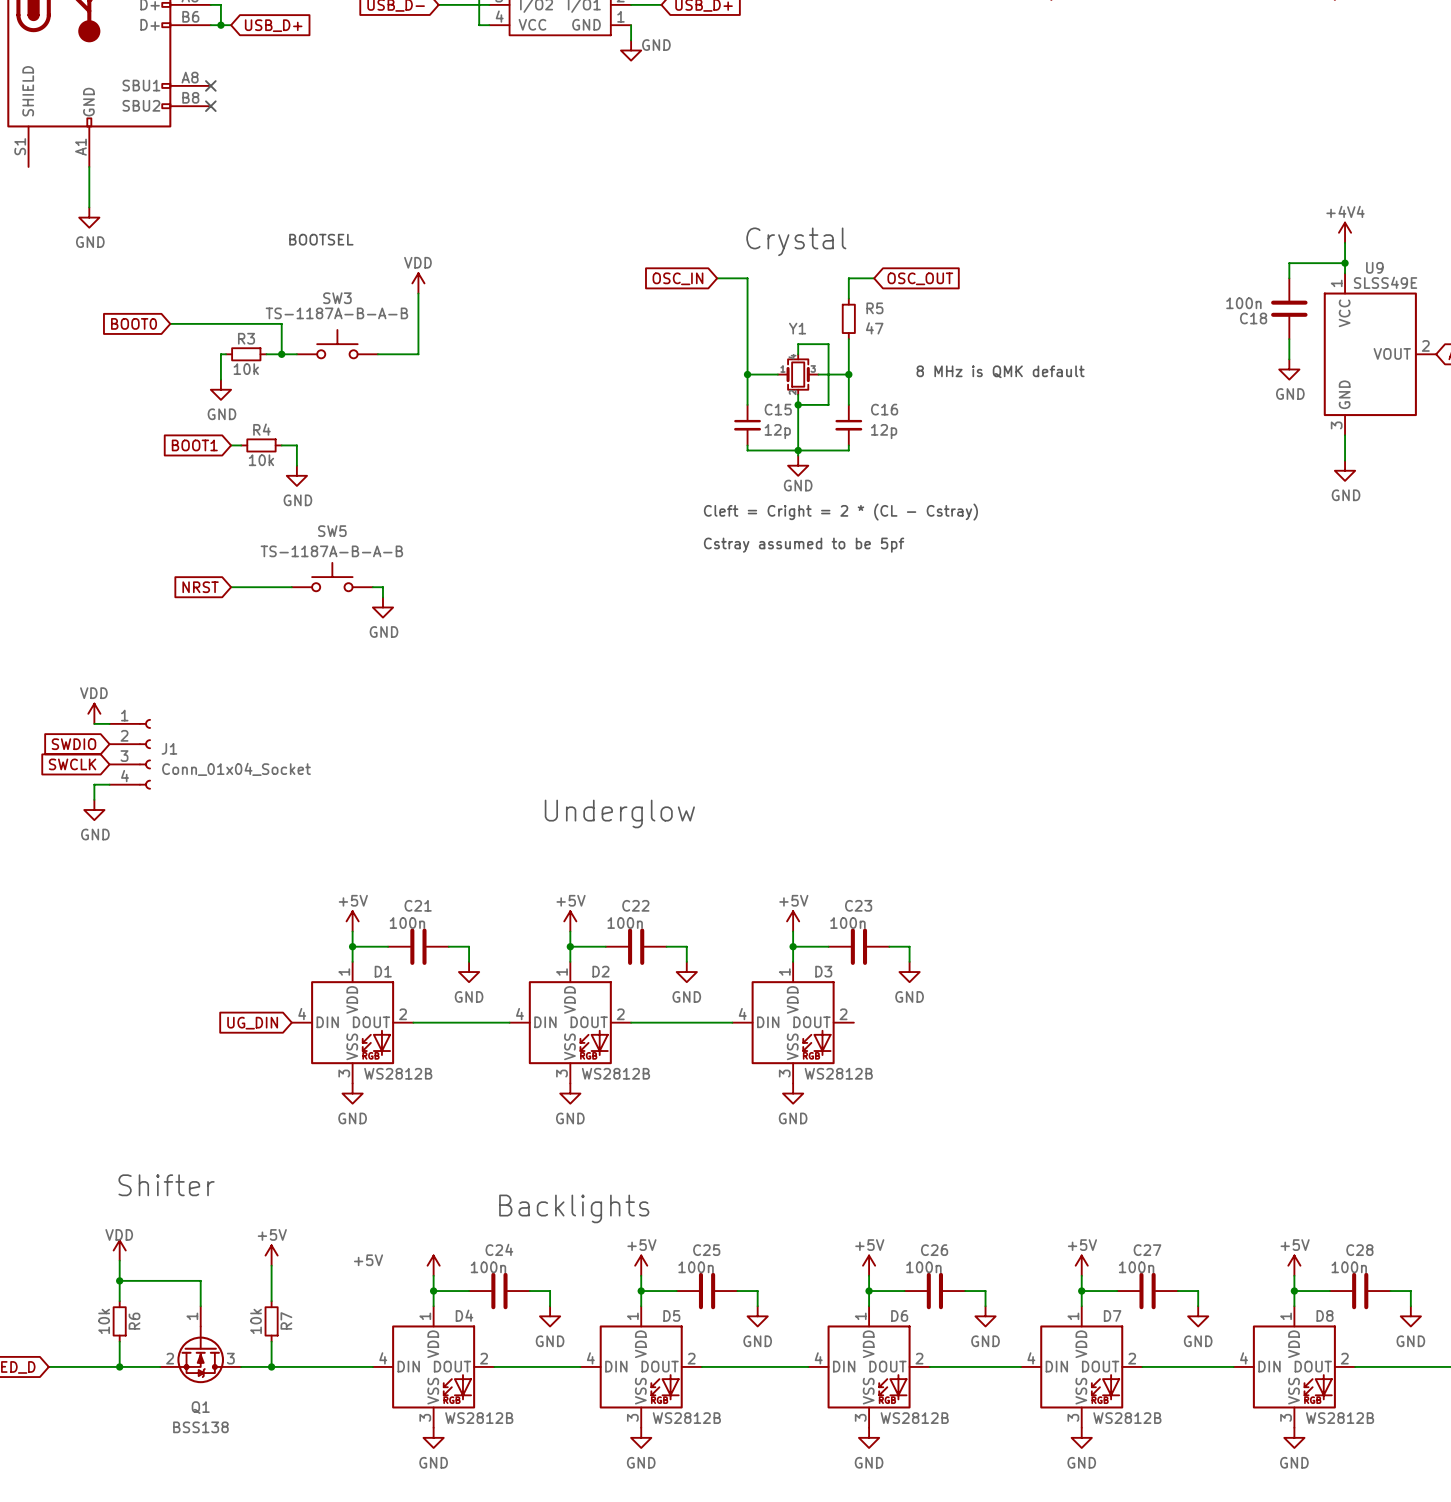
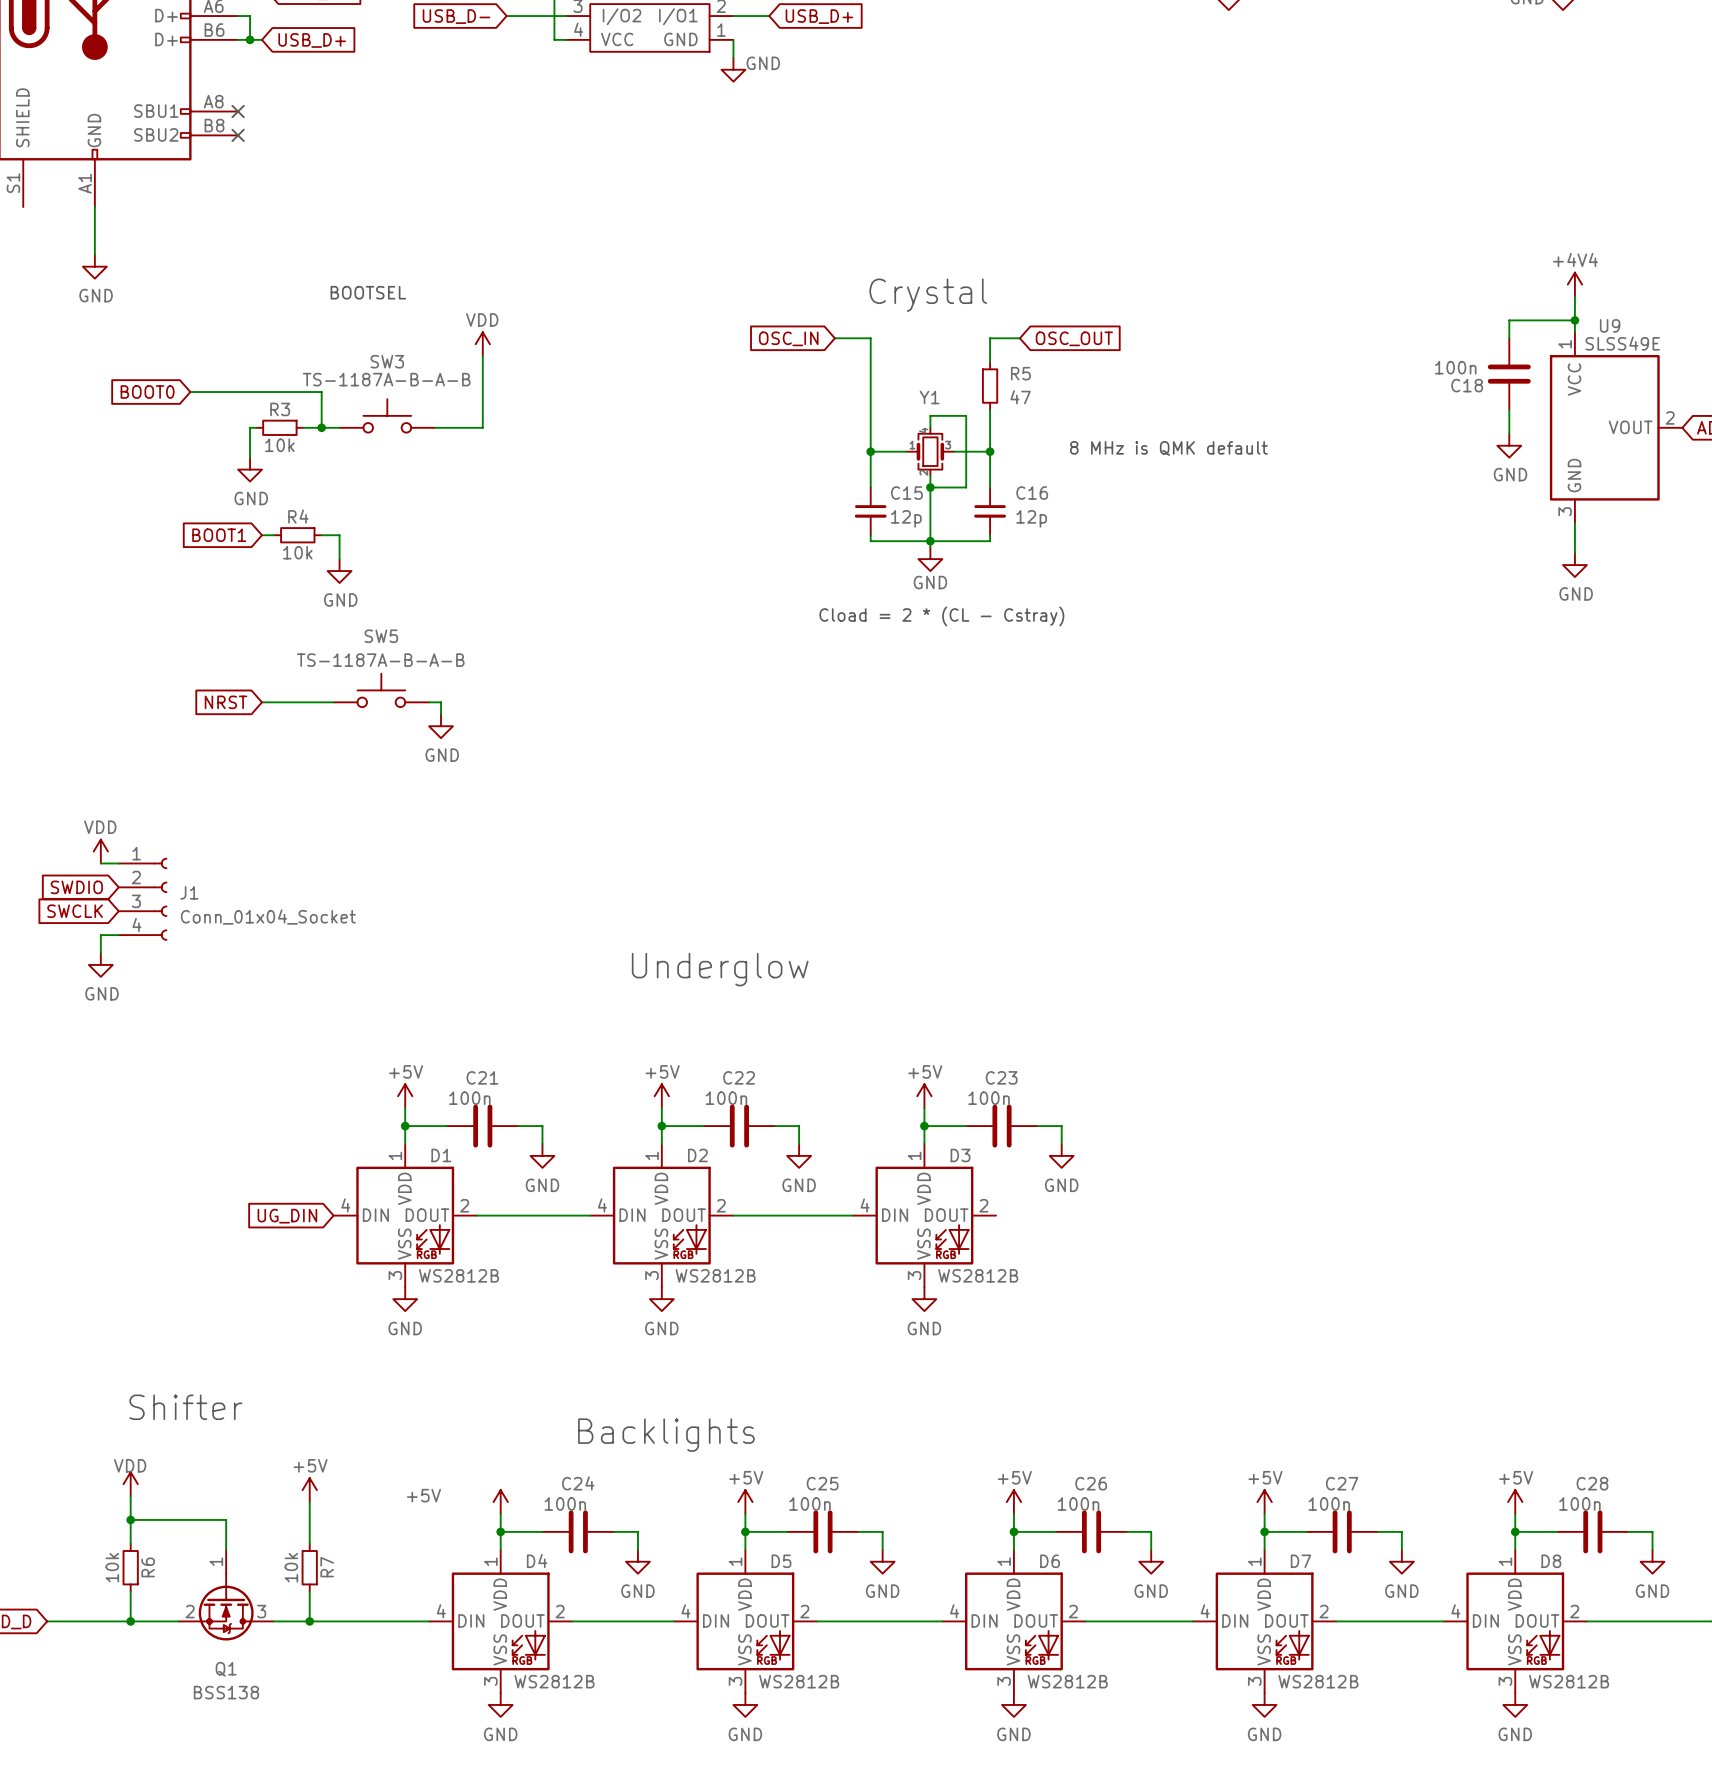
text: Cleft = Cright = 2 * (CL - Cstray) (840, 512) -> Cload = 2 * (CL - Cstray) (941, 616)
text: Cstray assumed to be 5pf (804, 545) -> none

